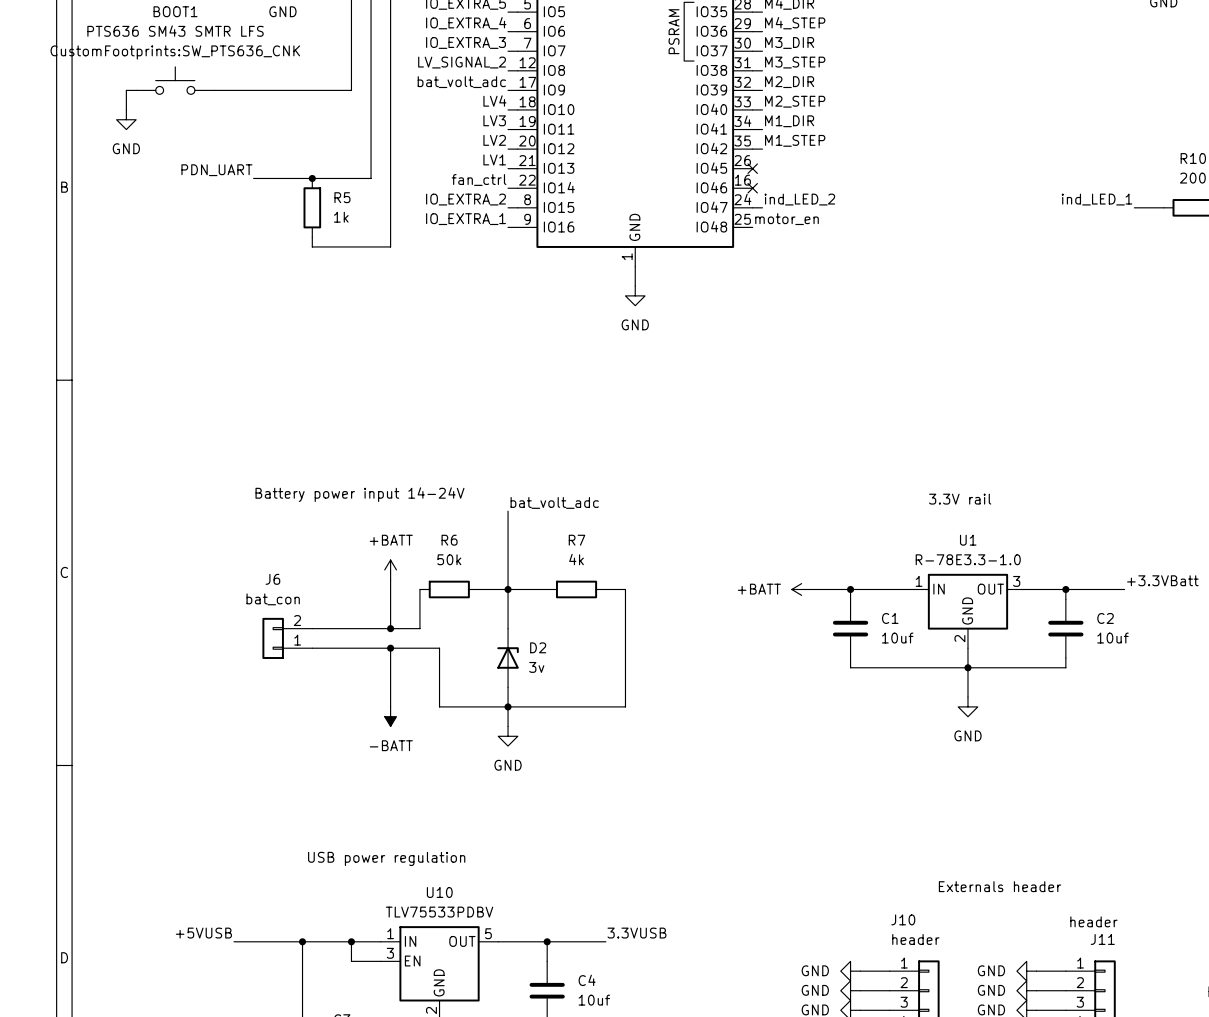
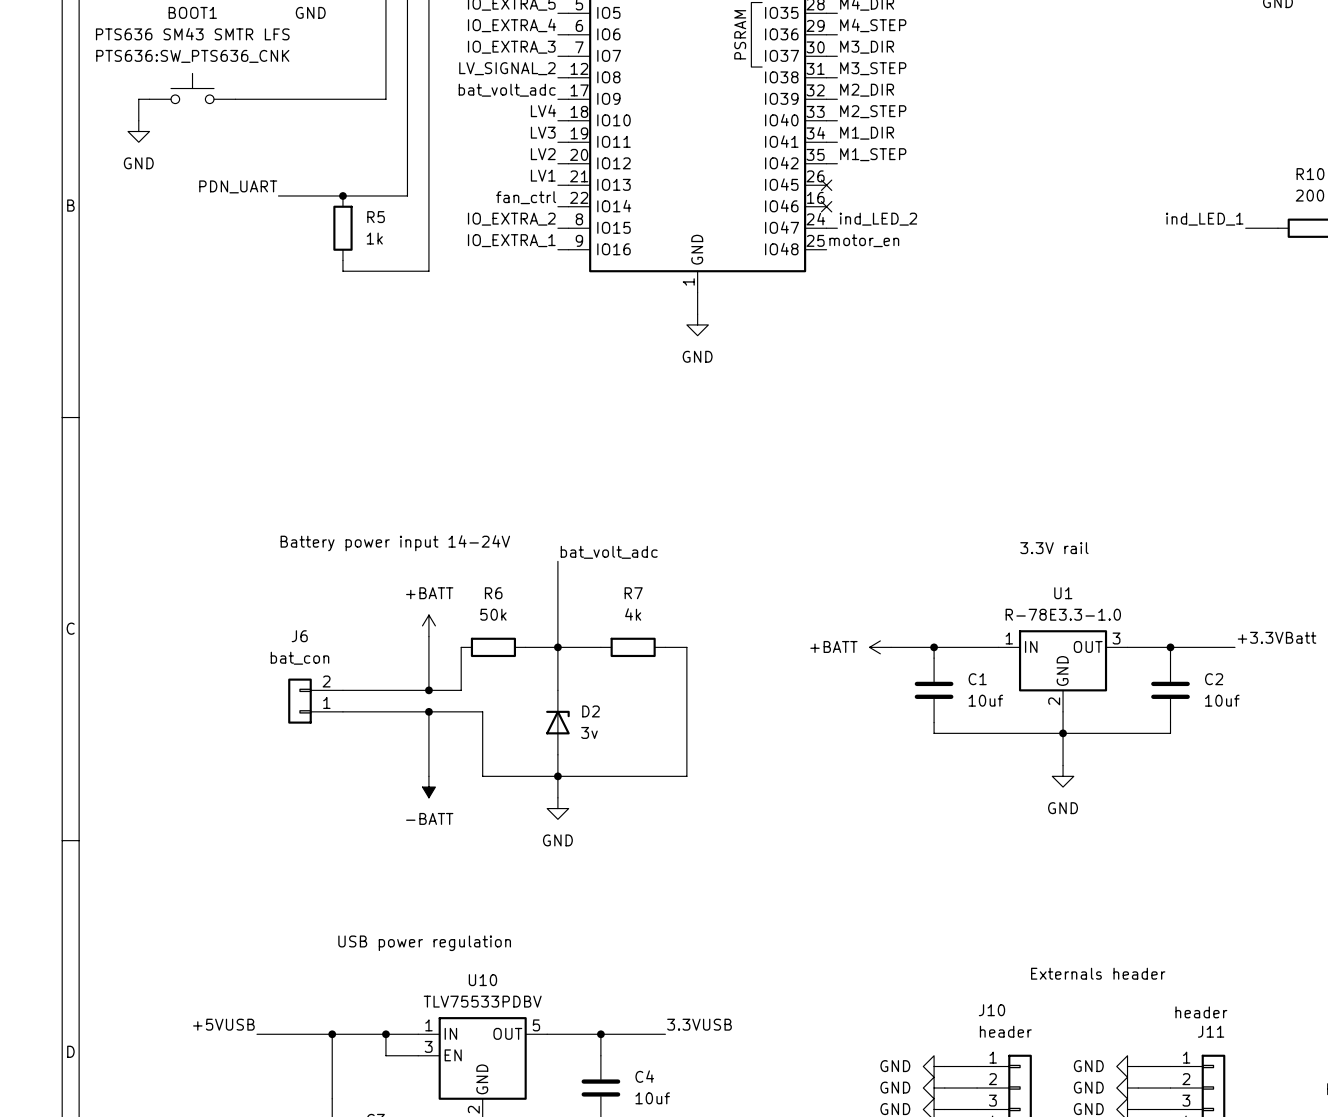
BOOT1 text: CustomFootprints:SW_PTS636_CNK (175, 52) -> PTS636:SW_PTS636_CNK (192, 56)

